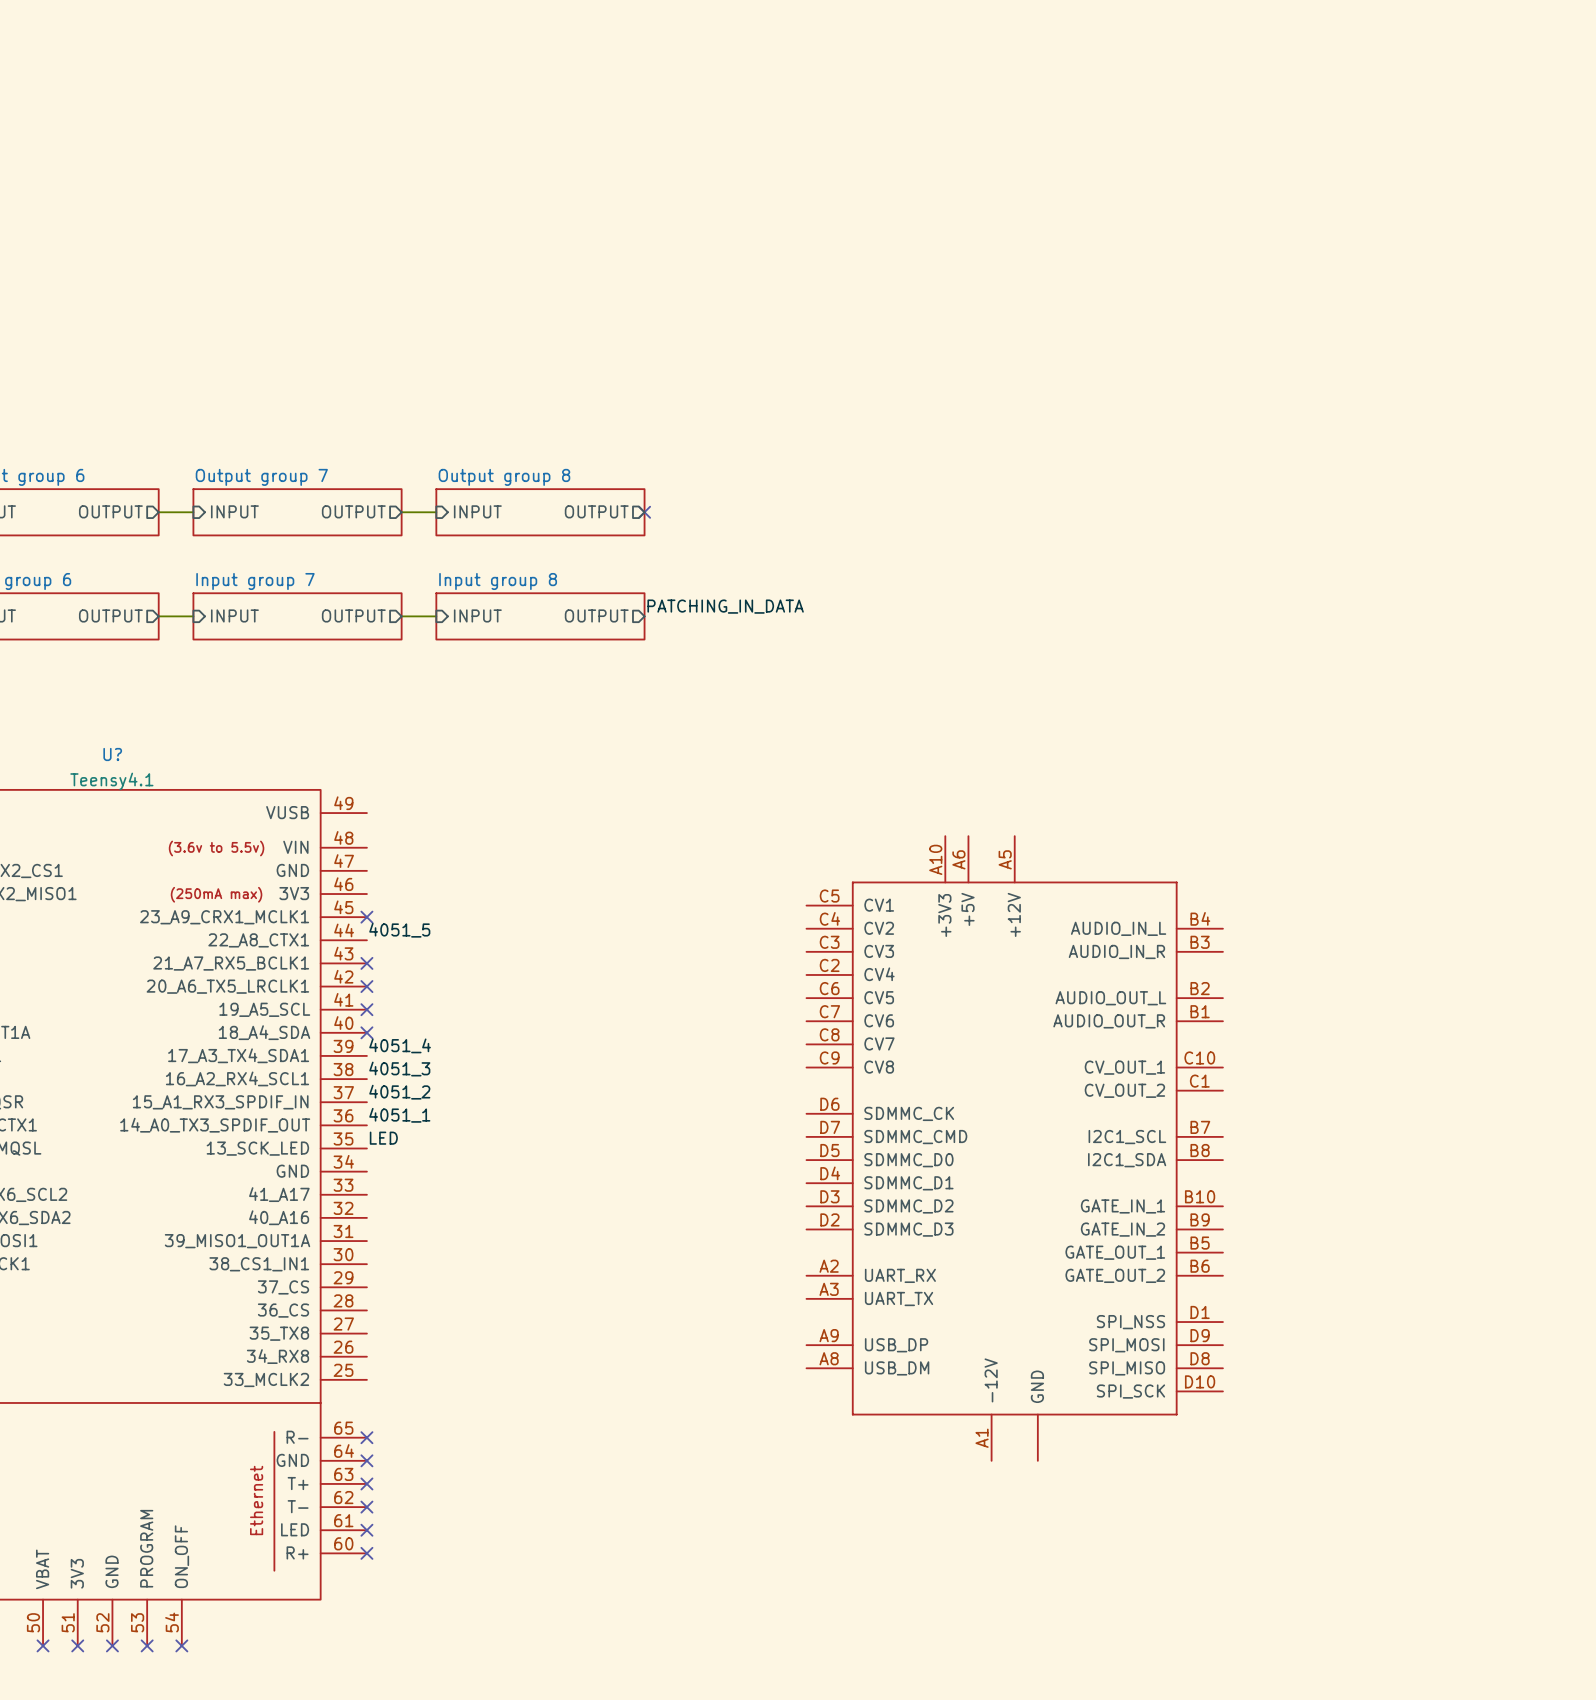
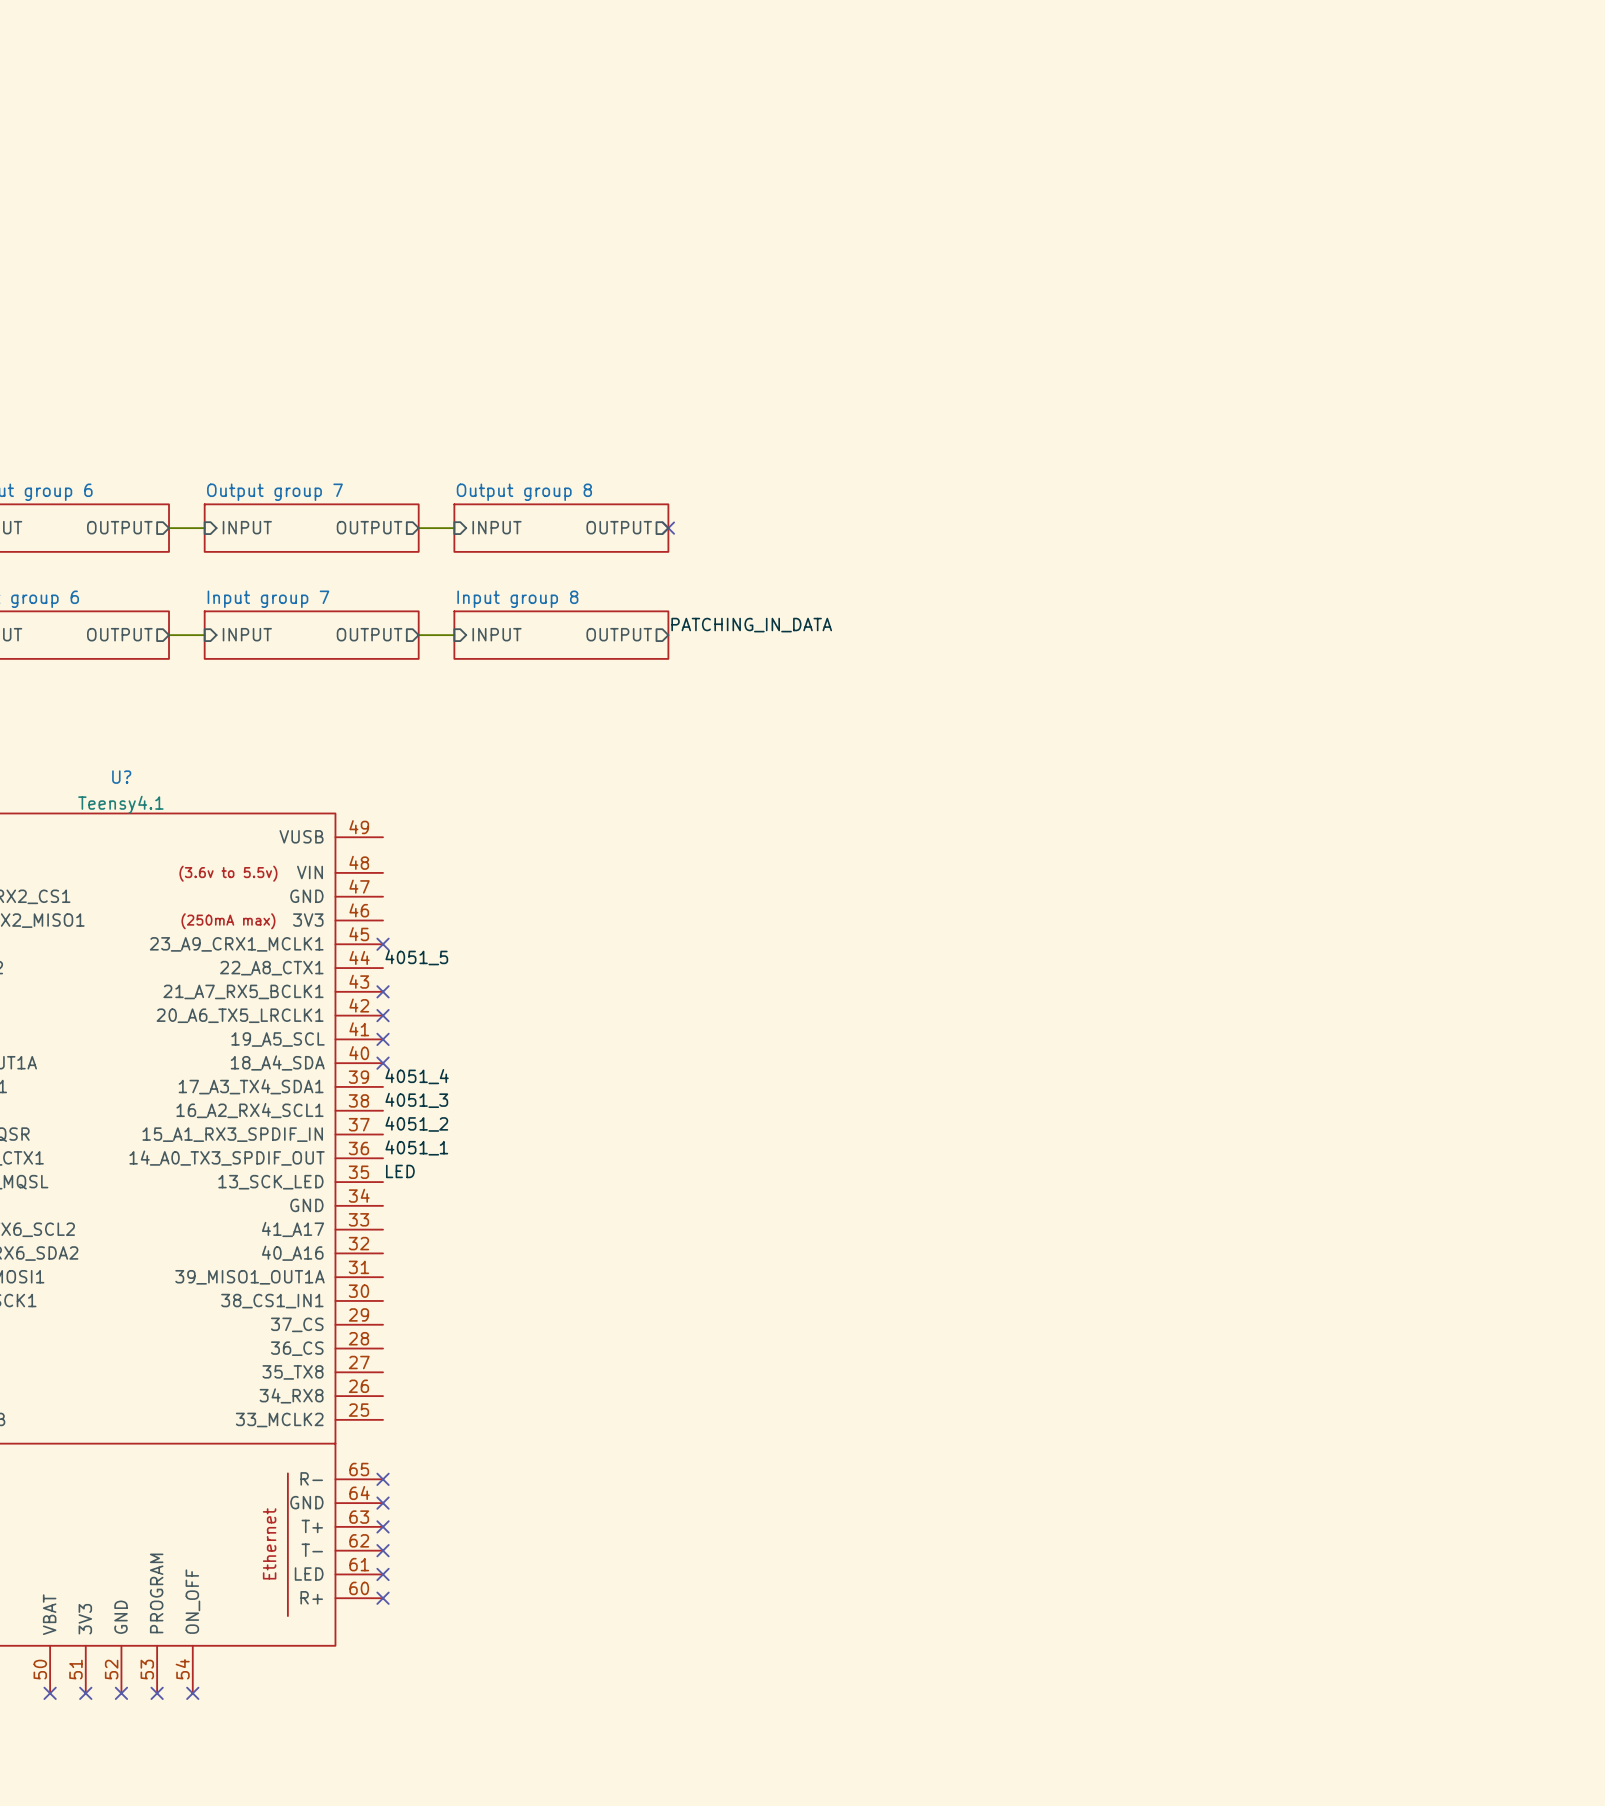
part: (1014, 1148) -> none

